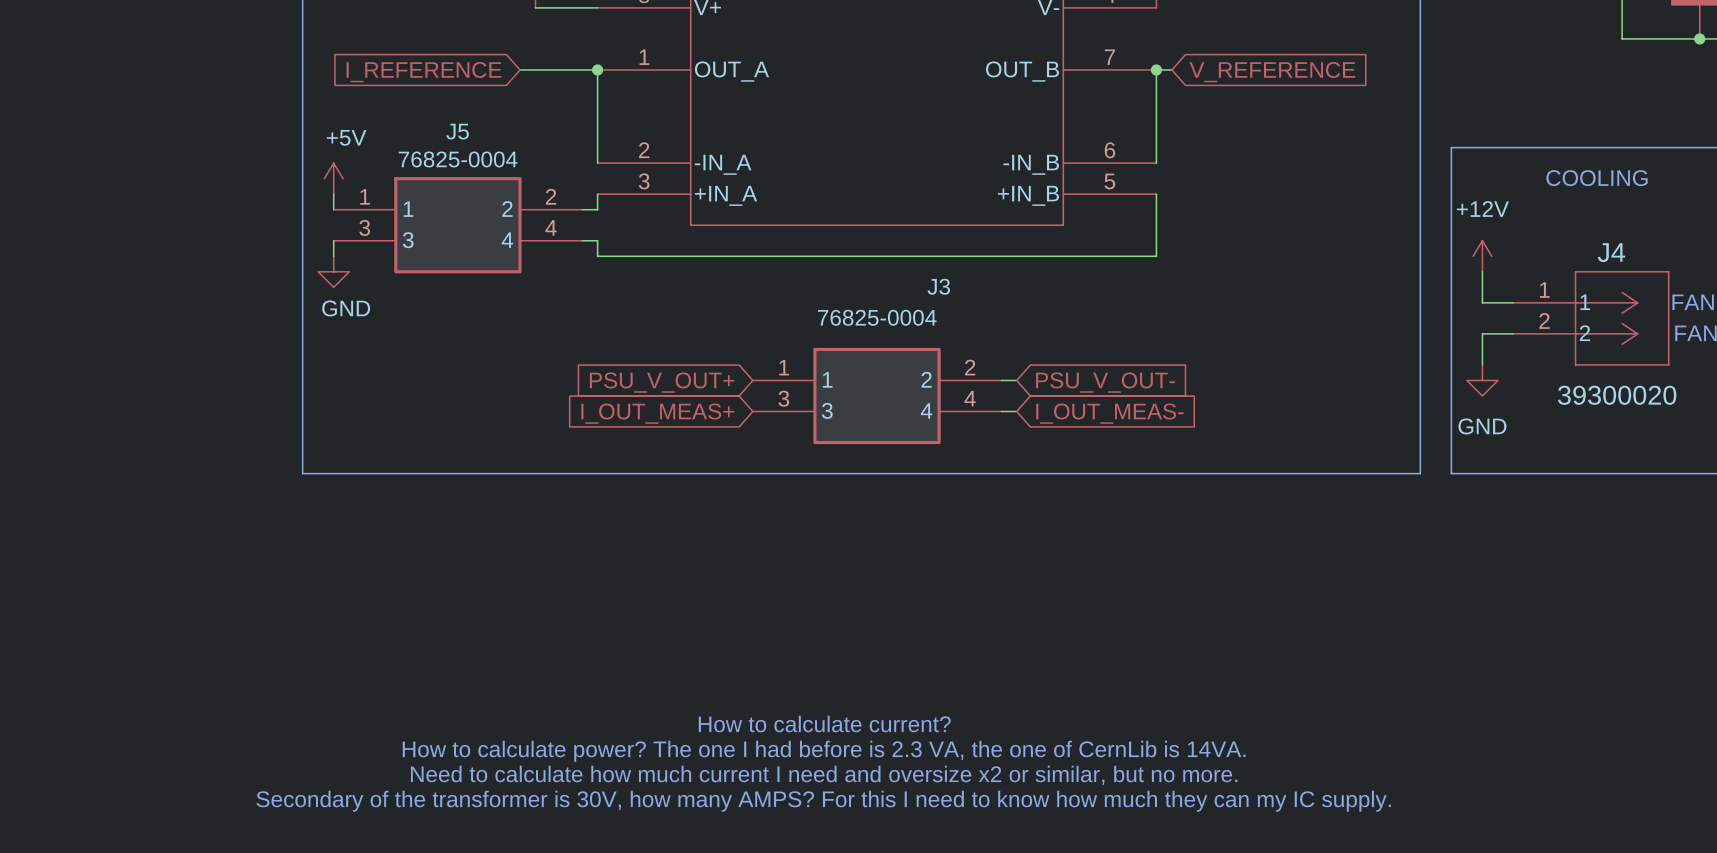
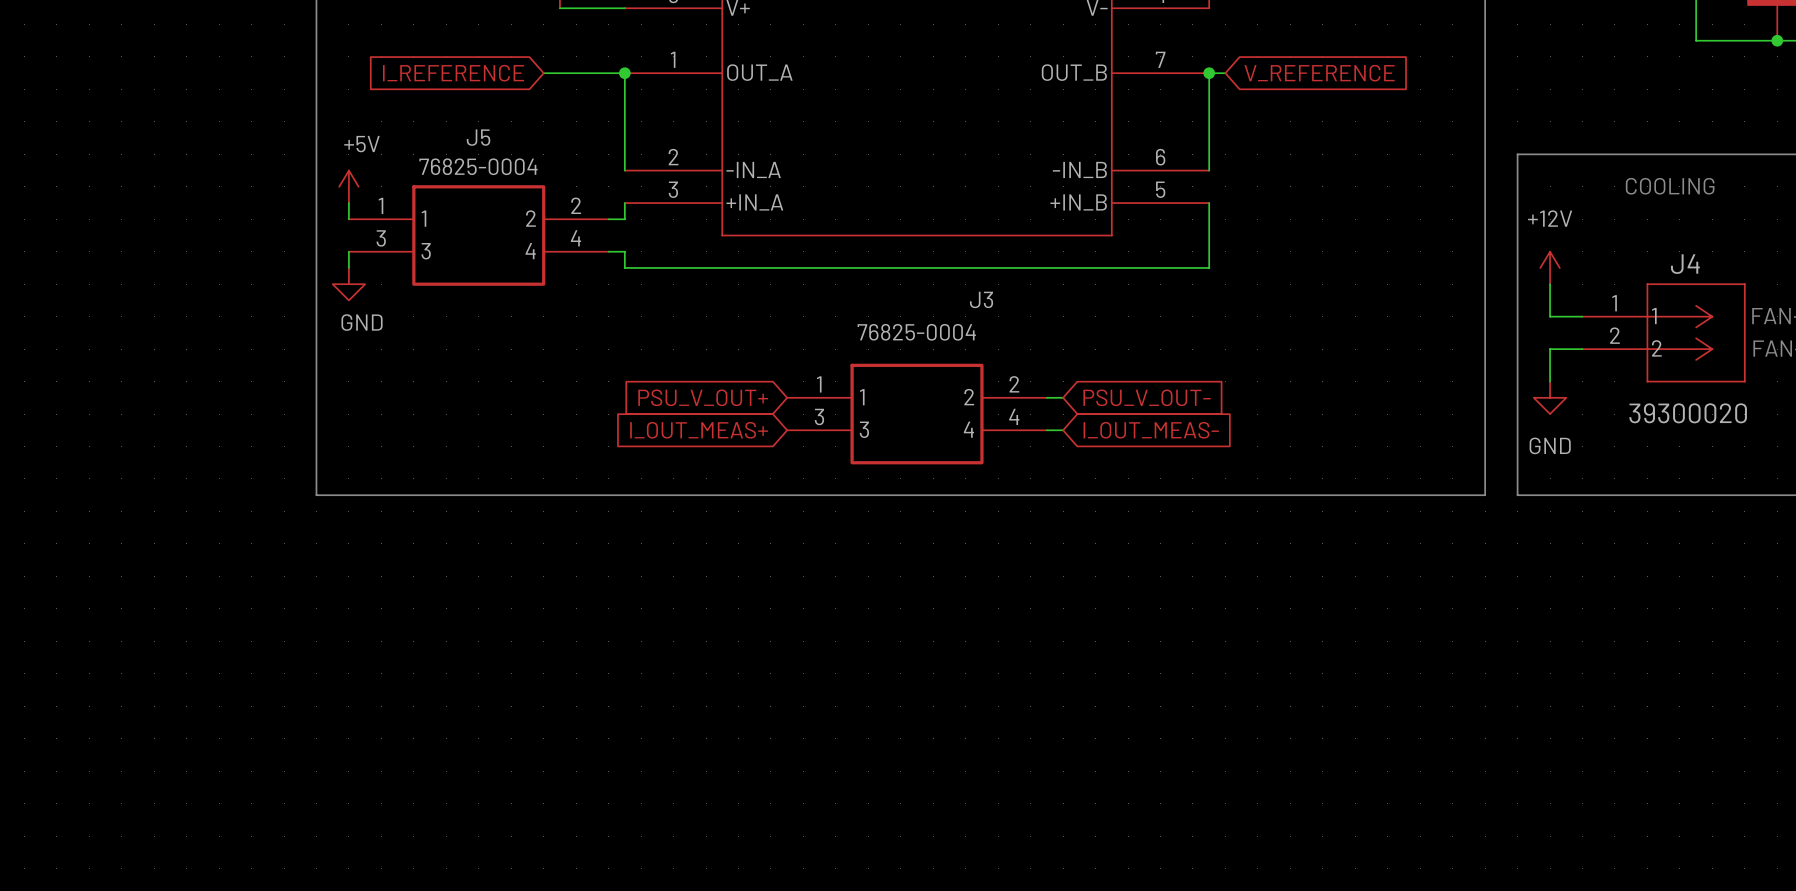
text: How to calculate current? (824, 724) -> none
text: How to calculate power? The one I had before is 2.3 VA, the one of CernLib is 14VA. (824, 751) -> none
text: Need to calculate how much current I need and oversize x2 or similar, but no more. (824, 775) -> none
text: Secondary of the transformer is 30V, how many AMPS? For this I need to know how much they can my IC supply. (823, 801) -> none

